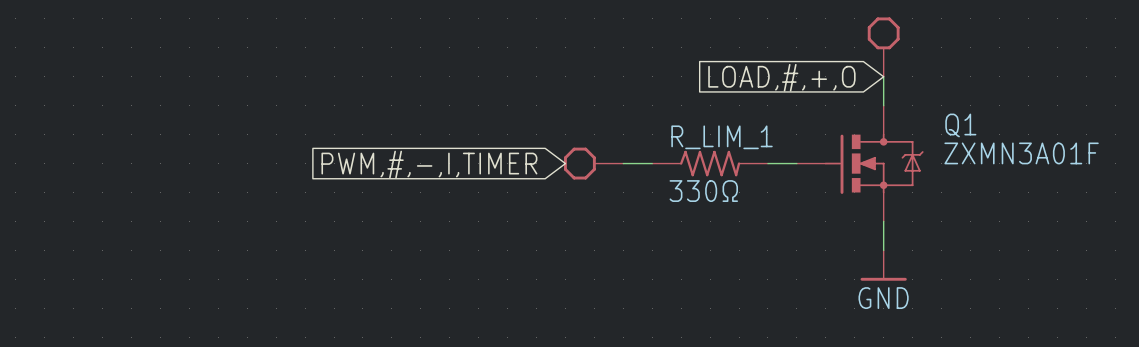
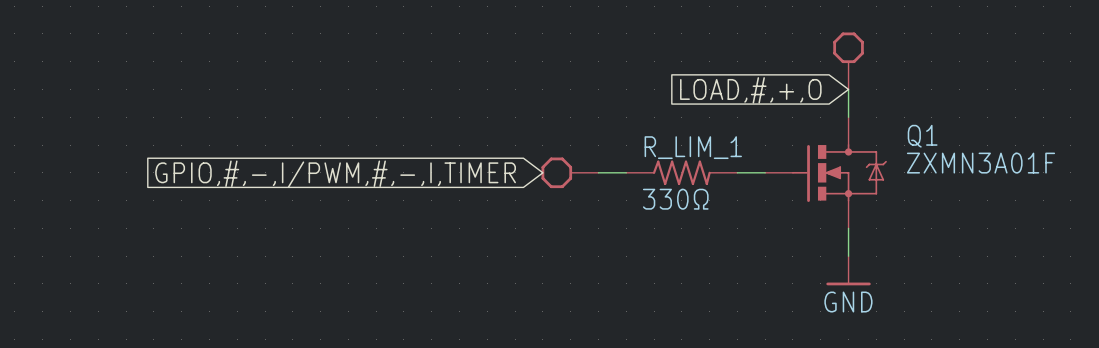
global label: PWM,#,-,I,TIMER (429, 164) -> GPIO,#,-,I/PWM,#,-,I,TIMER (335, 174)

